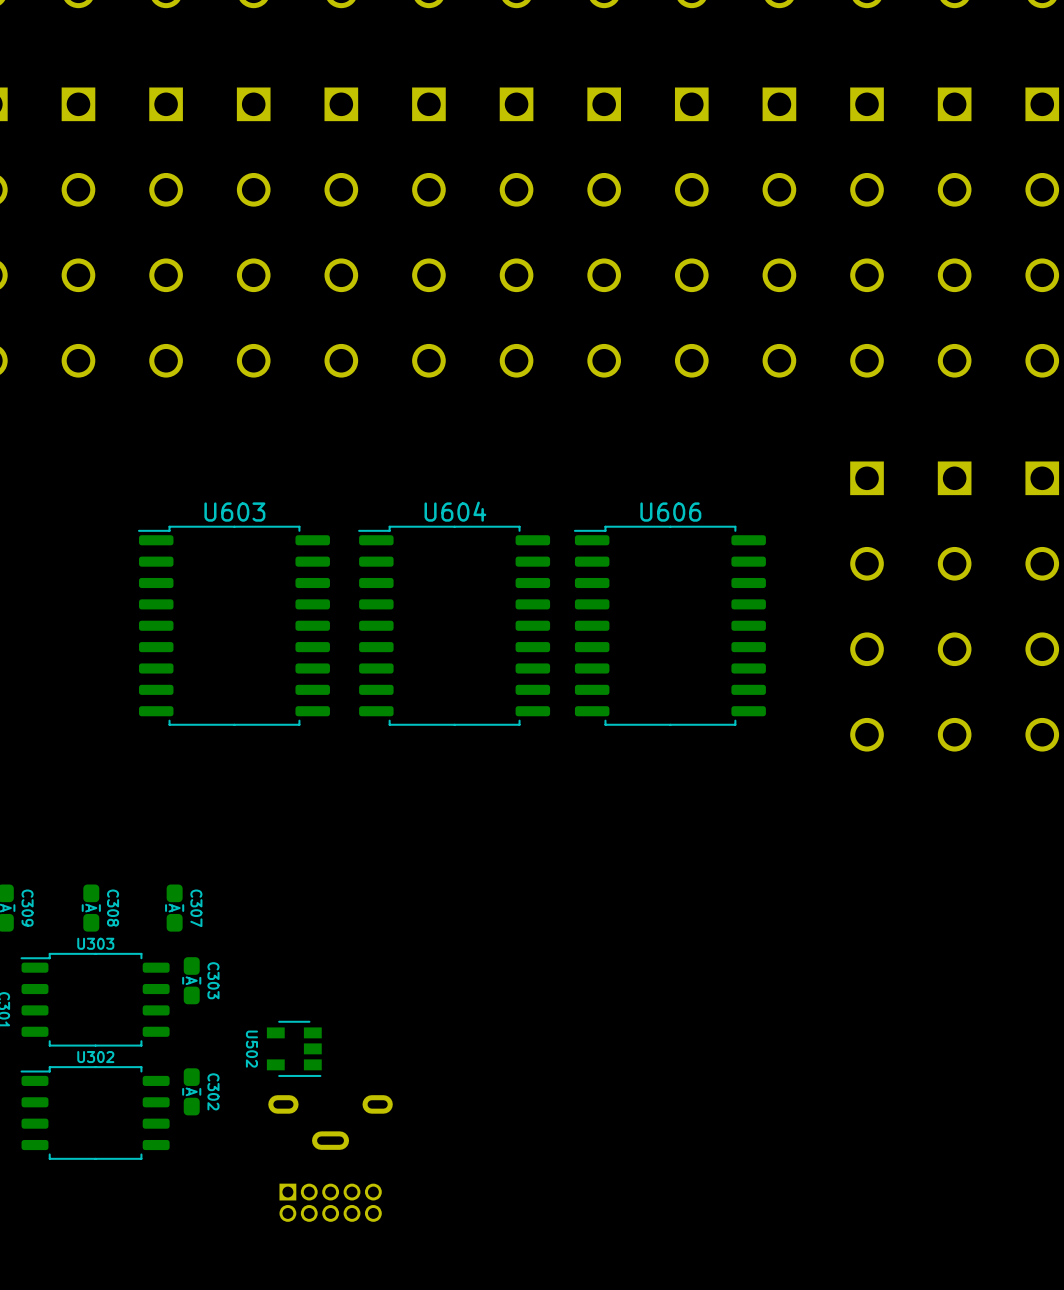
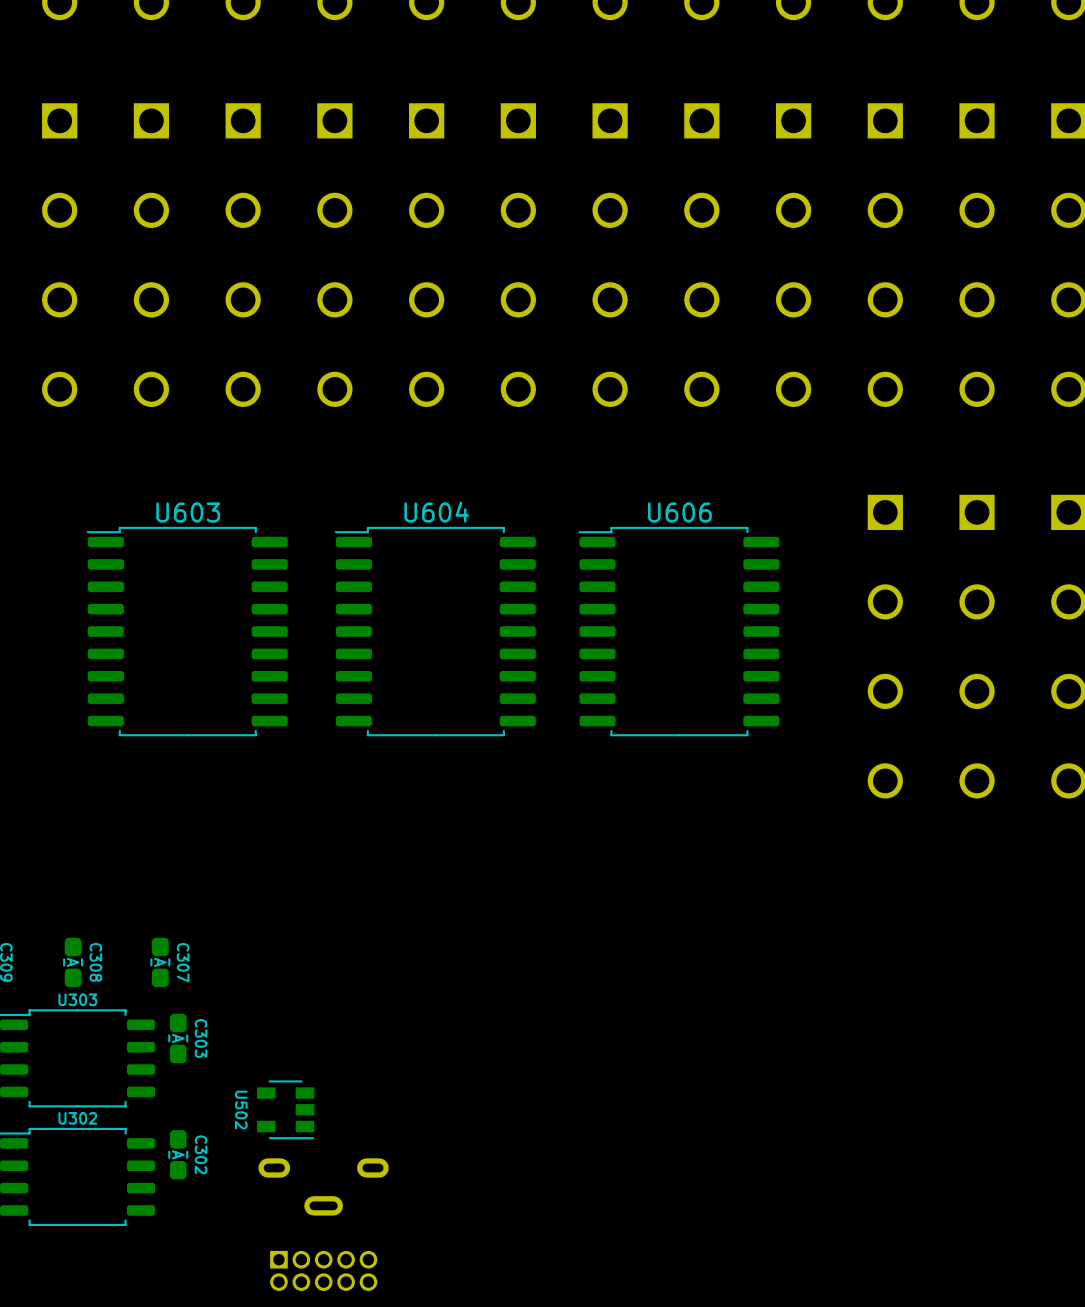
U603 position: (233, 625) -> (187, 631)
U604 position: (454, 625) -> (435, 631)
U606 position: (669, 625) -> (678, 631)

